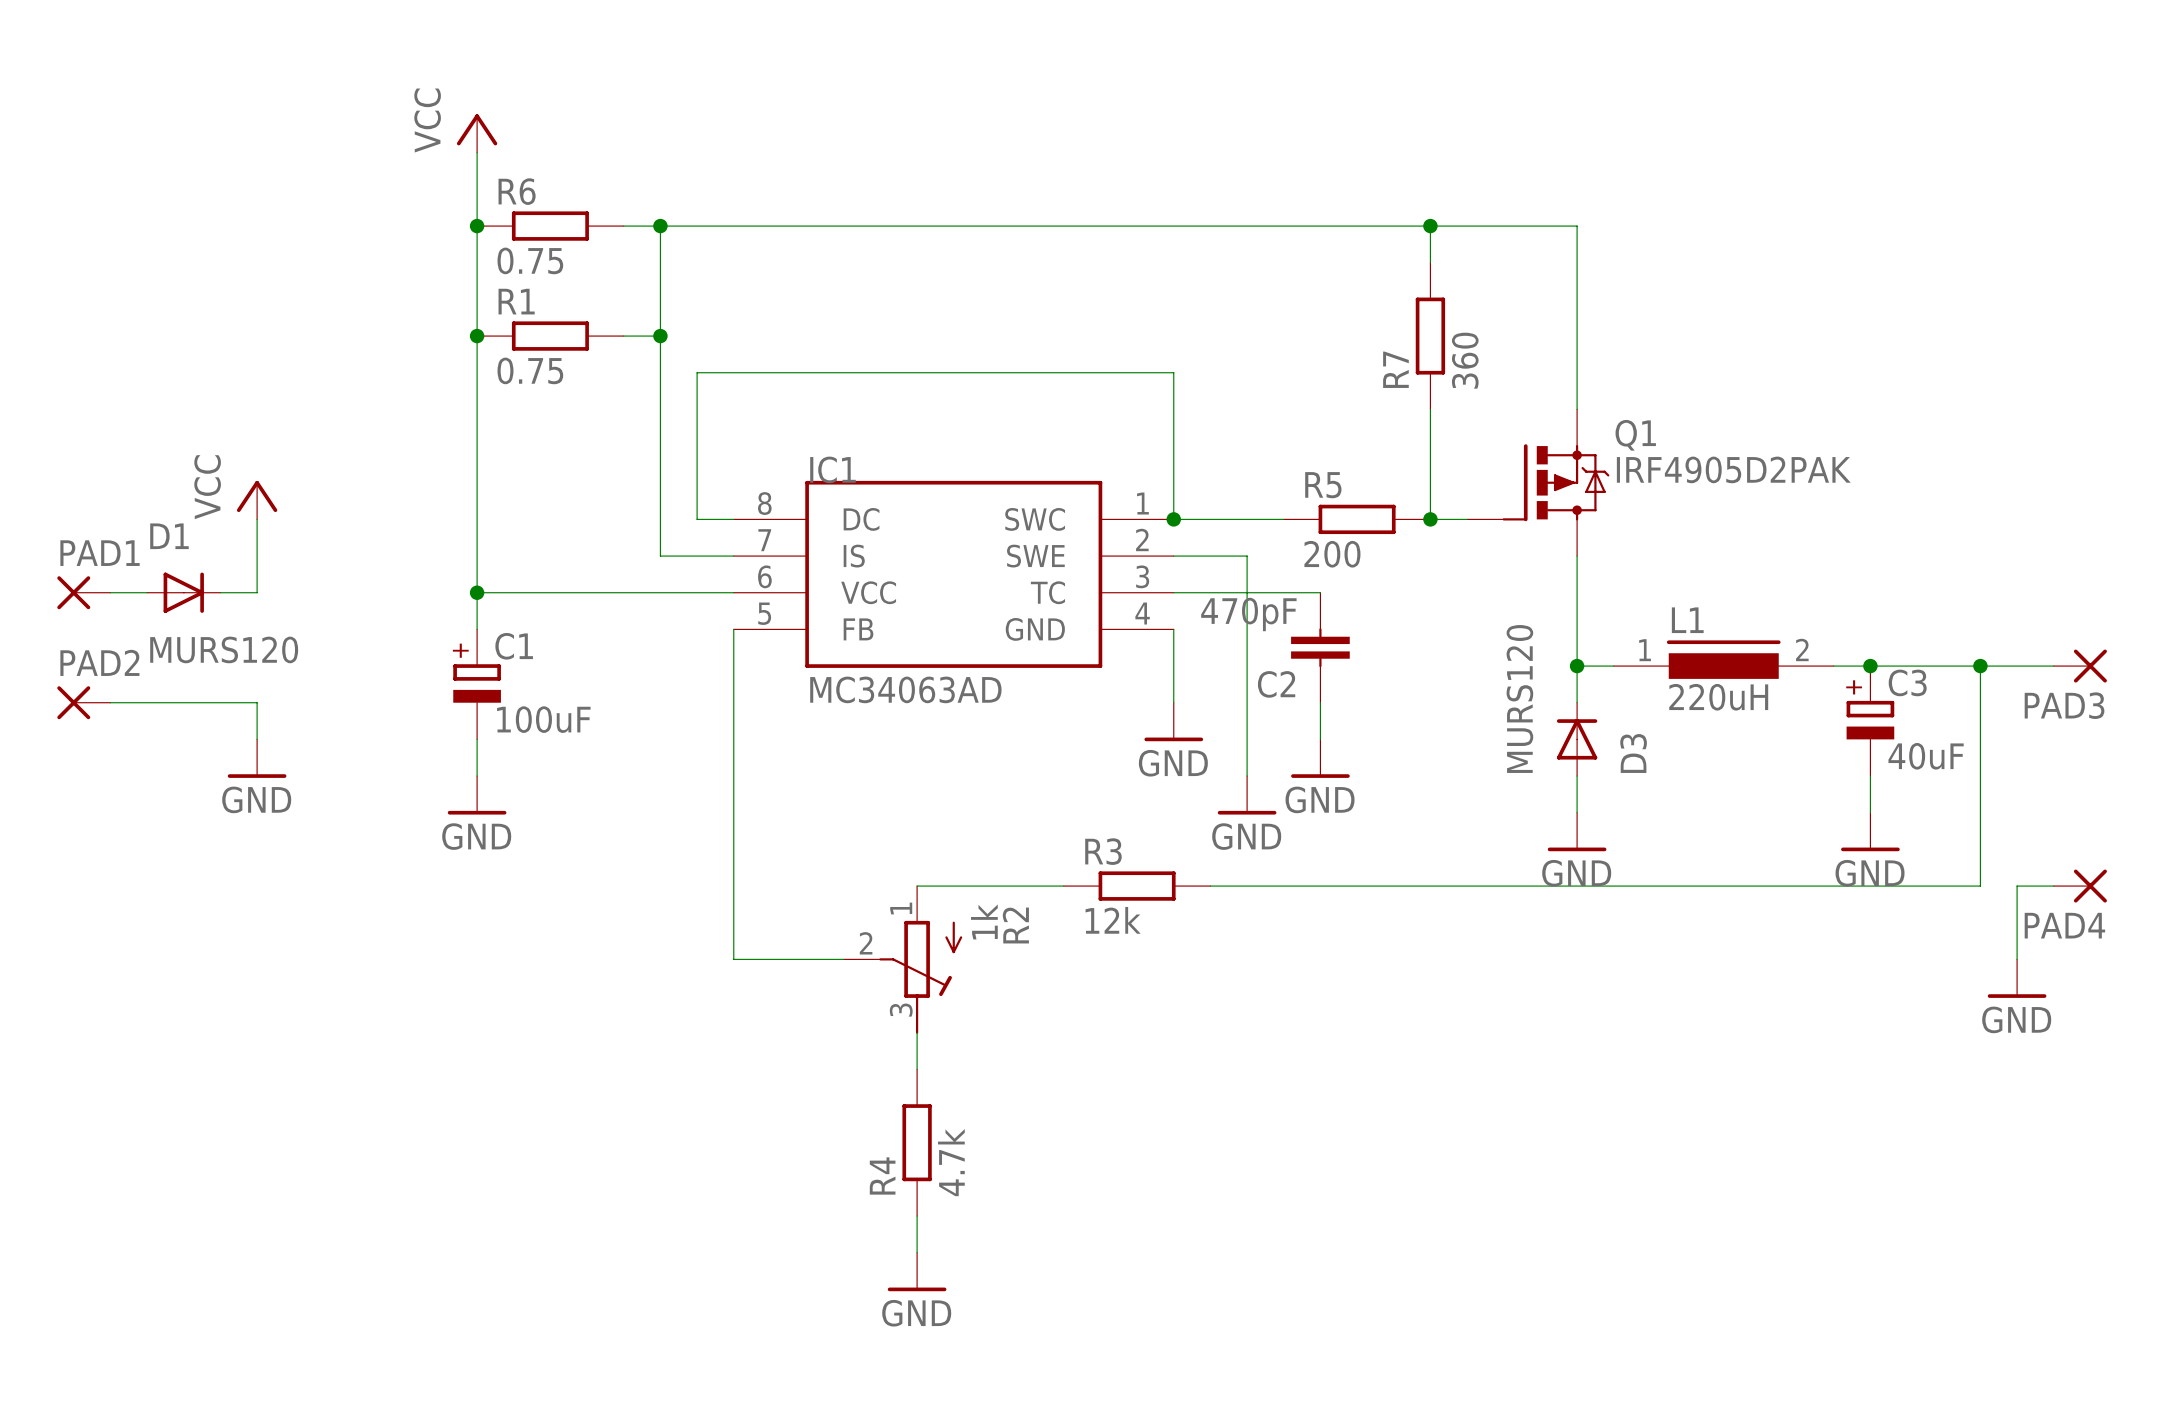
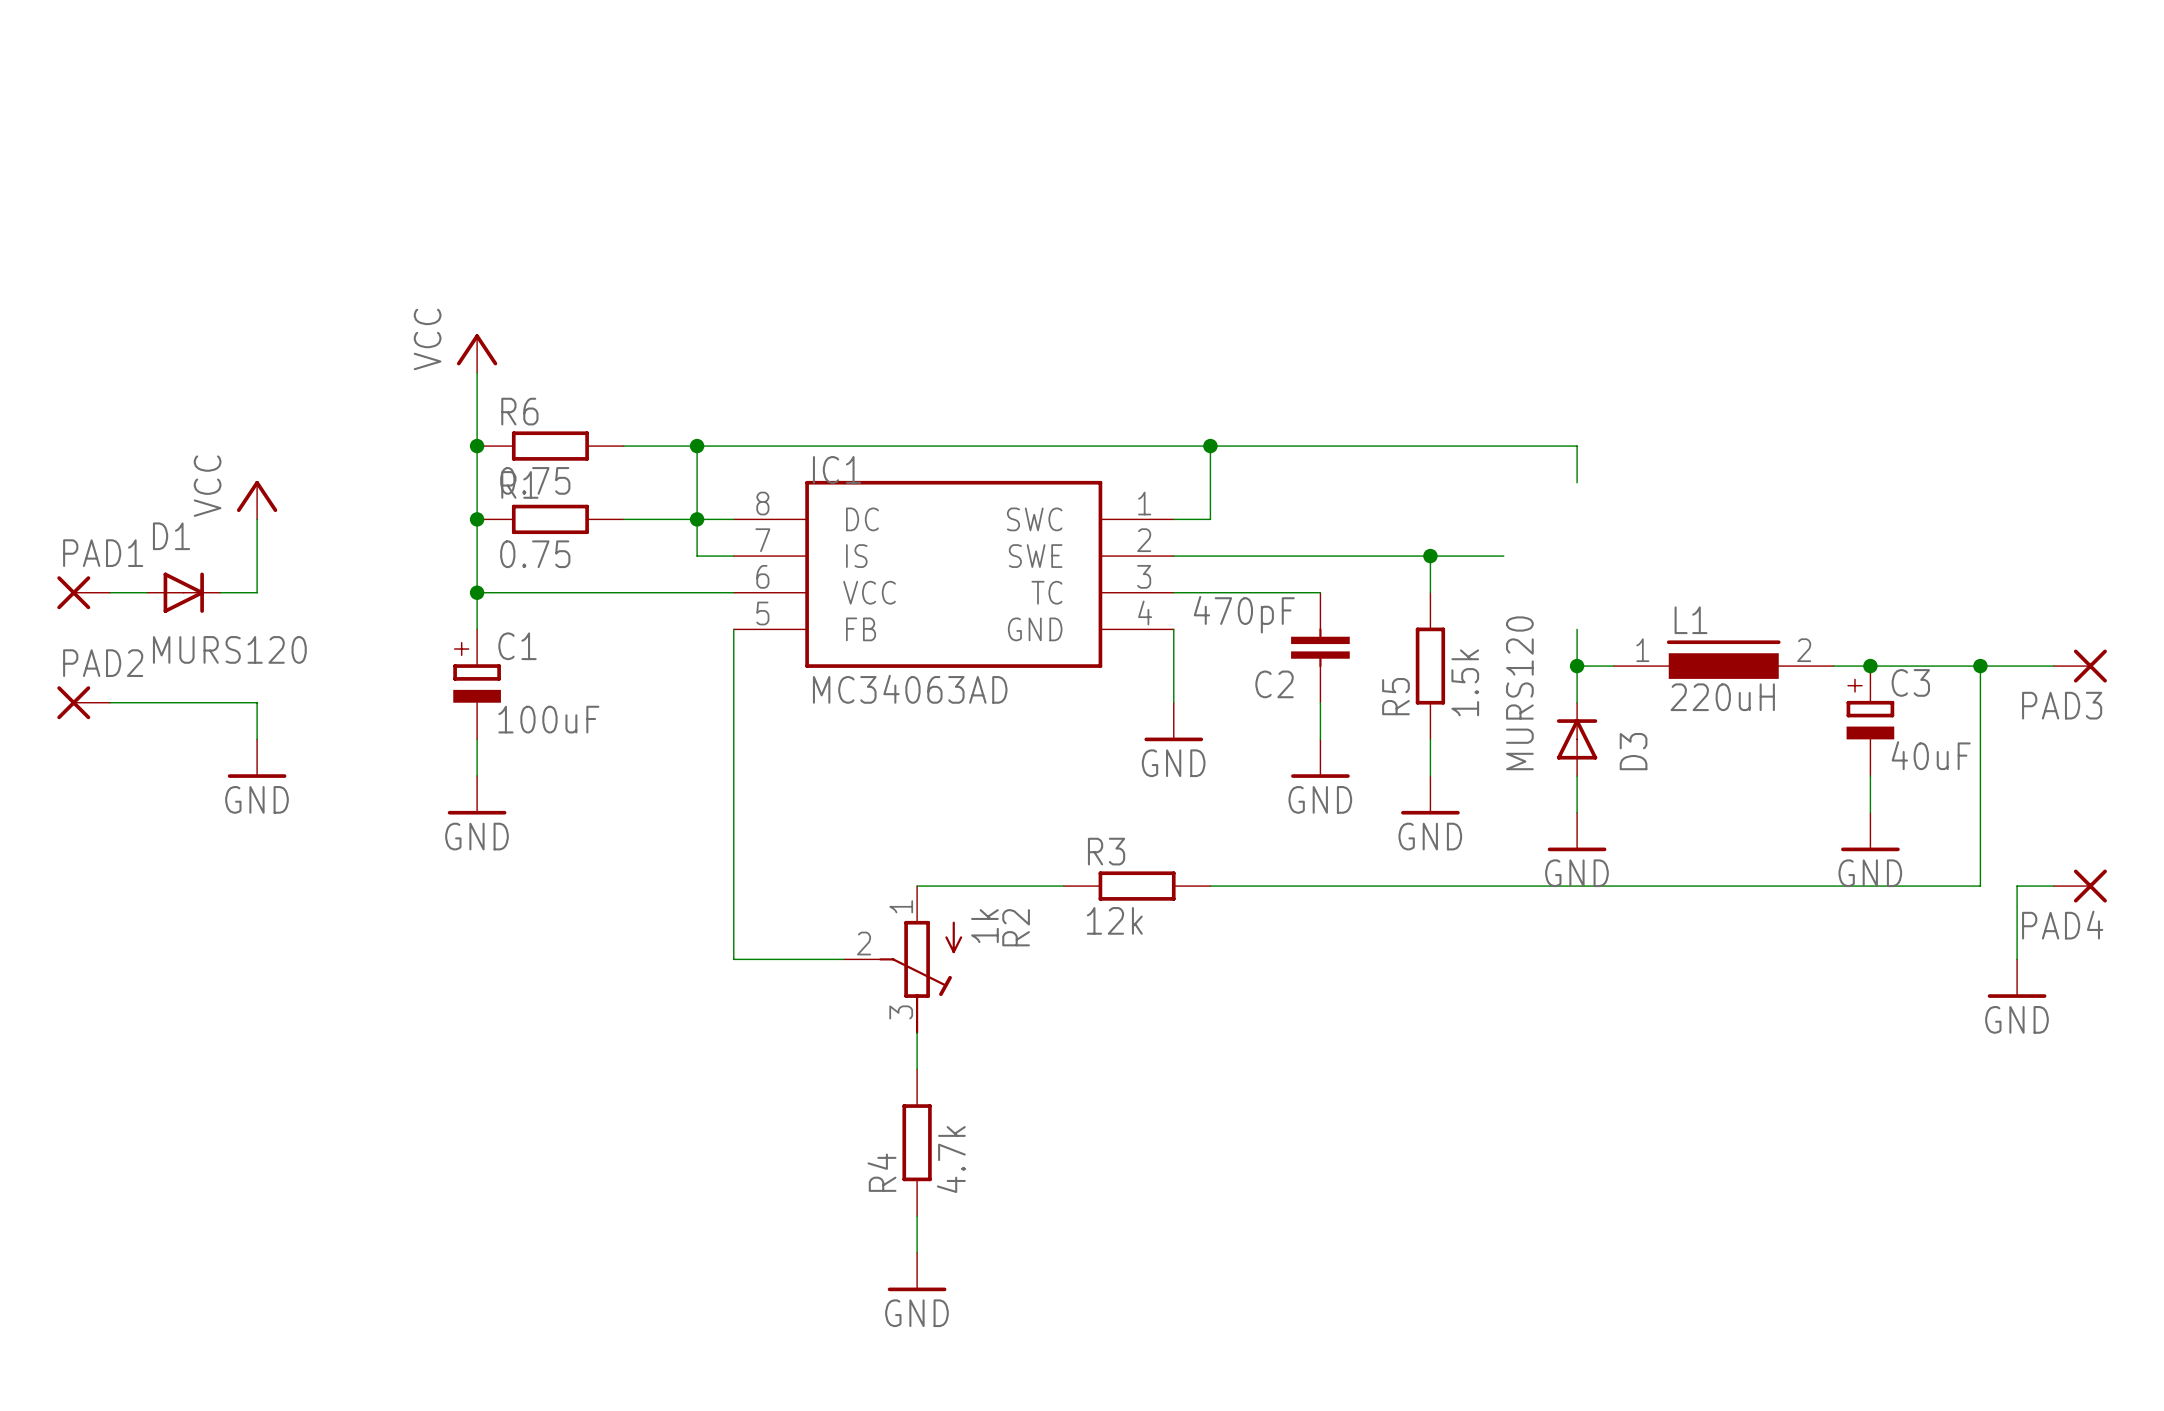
power symbol position: VCC (477, 133) -> VCC (477, 353)
wire: (477, 152) (477, 372) -> none
junction: (477, 226) -> none
R6 position: (550, 226) -> (550, 446)
wire: (623, 226) (1577, 226) (1577, 409) -> none
wire: (660, 226) (660, 556) (697, 556) -> (623, 519) (697, 519) (697, 556)
junction: (660, 226) -> none
wire: (1430, 226) (1430, 262) -> (1430, 556) (1430, 592)
junction: (1430, 226) -> none
junction: (477, 336) -> none
R1 position: (550, 336) -> (550, 519)
wire: (623, 336) (660, 336) -> none
junction: (660, 336) -> none
R7: 360 (1430, 336) -> none
wire: (1430, 409) (1430, 519) (1467, 519) -> none
junction: none -> (477, 446)
wire: none -> (623, 446) (1577, 446) (1577, 482)
wire: (697, 446) (697, 372) (1173, 372) (1173, 519) -> none
junction: none -> (697, 446)
Q1: IRF4905D2PAK (1538, 482) -> none
R5 name position: R5 (1323, 485) -> R5 (1395, 696)
junction: none -> (477, 519)
junction: none -> (697, 519)
junction position: (1173, 519) -> (1210, 446)
wire: (1210, 519) (1283, 519) -> (1210, 519) (1210, 446)
R5 rotation: 0° (1357, 519) -> 90° clockwise (1430, 666)
R5 position: (1357, 519) -> (1430, 666)
junction position: (1430, 519) -> (1430, 556)
R5 value: 200 (1332, 554) -> 1.5k (1465, 682)
wire: (1247, 556) (1247, 776) -> (1247, 556) (1503, 556)
wire: (1577, 556) (1577, 629) -> none
wire: none -> (1430, 739) (1430, 776)
power symbol position: GND (1247, 795) -> GND (1430, 795)

